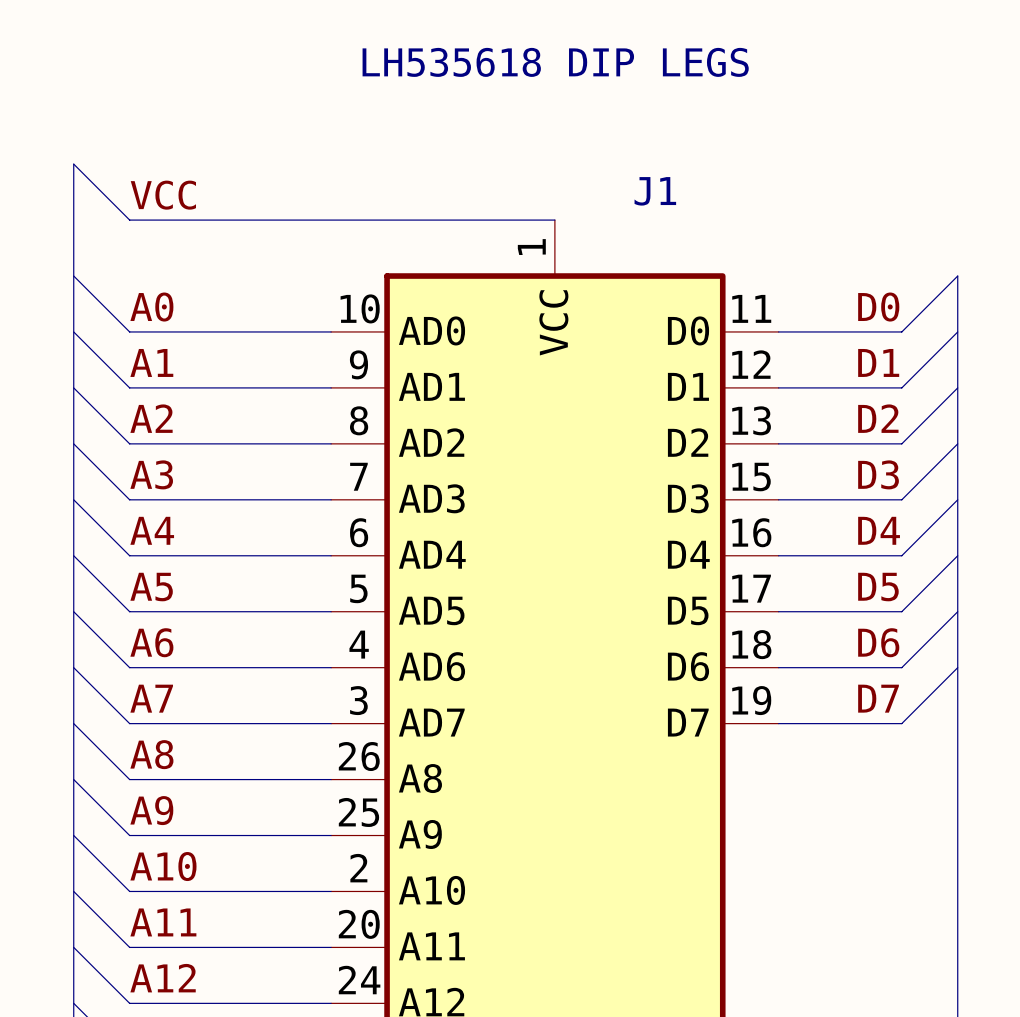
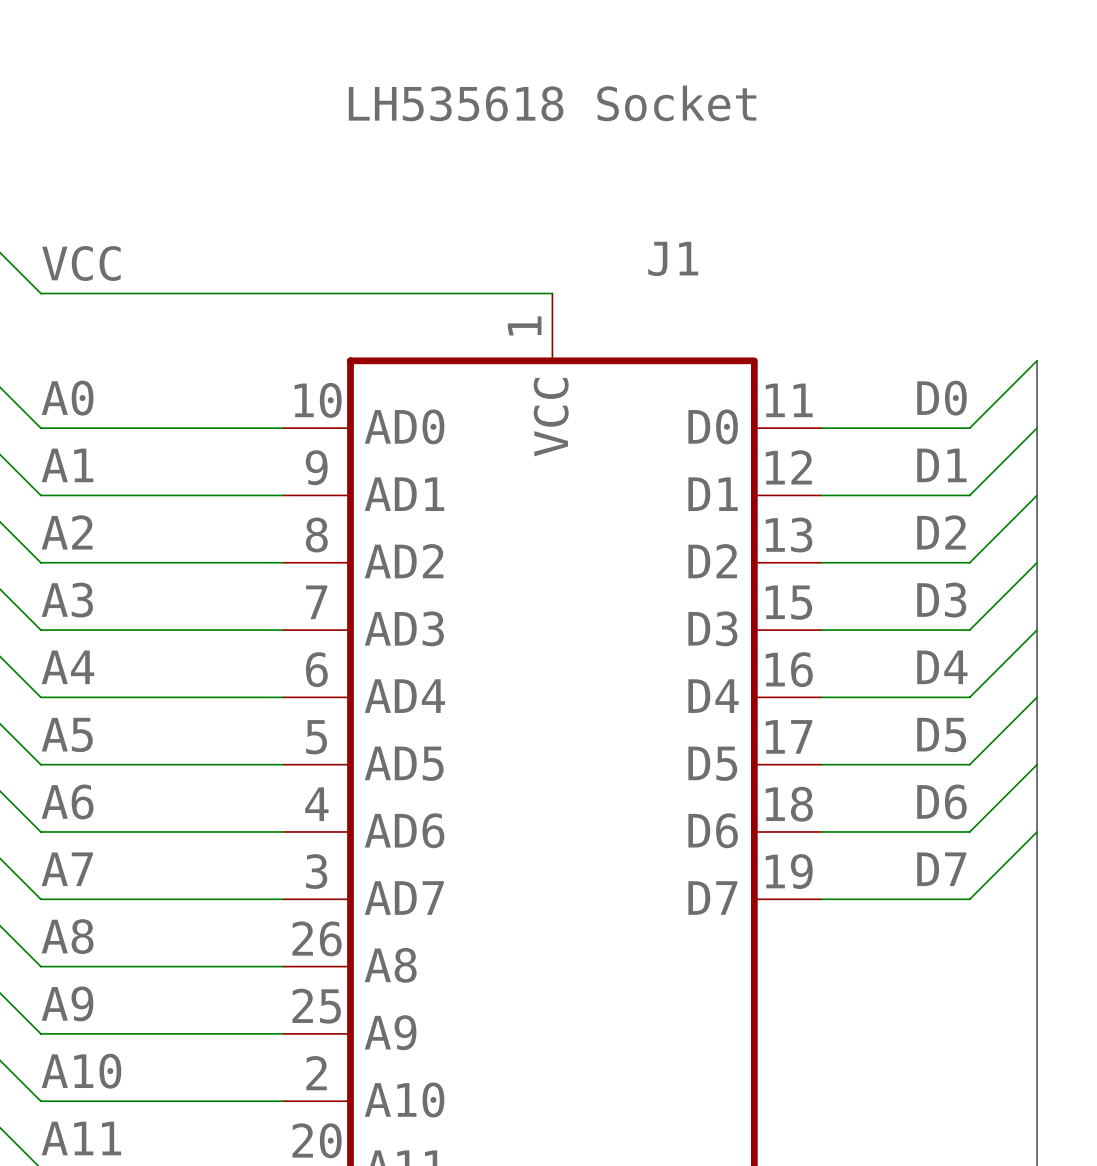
J1 value: LH535618 DIP LEGS (555, 62) -> LH535618 Socket (552, 103)

